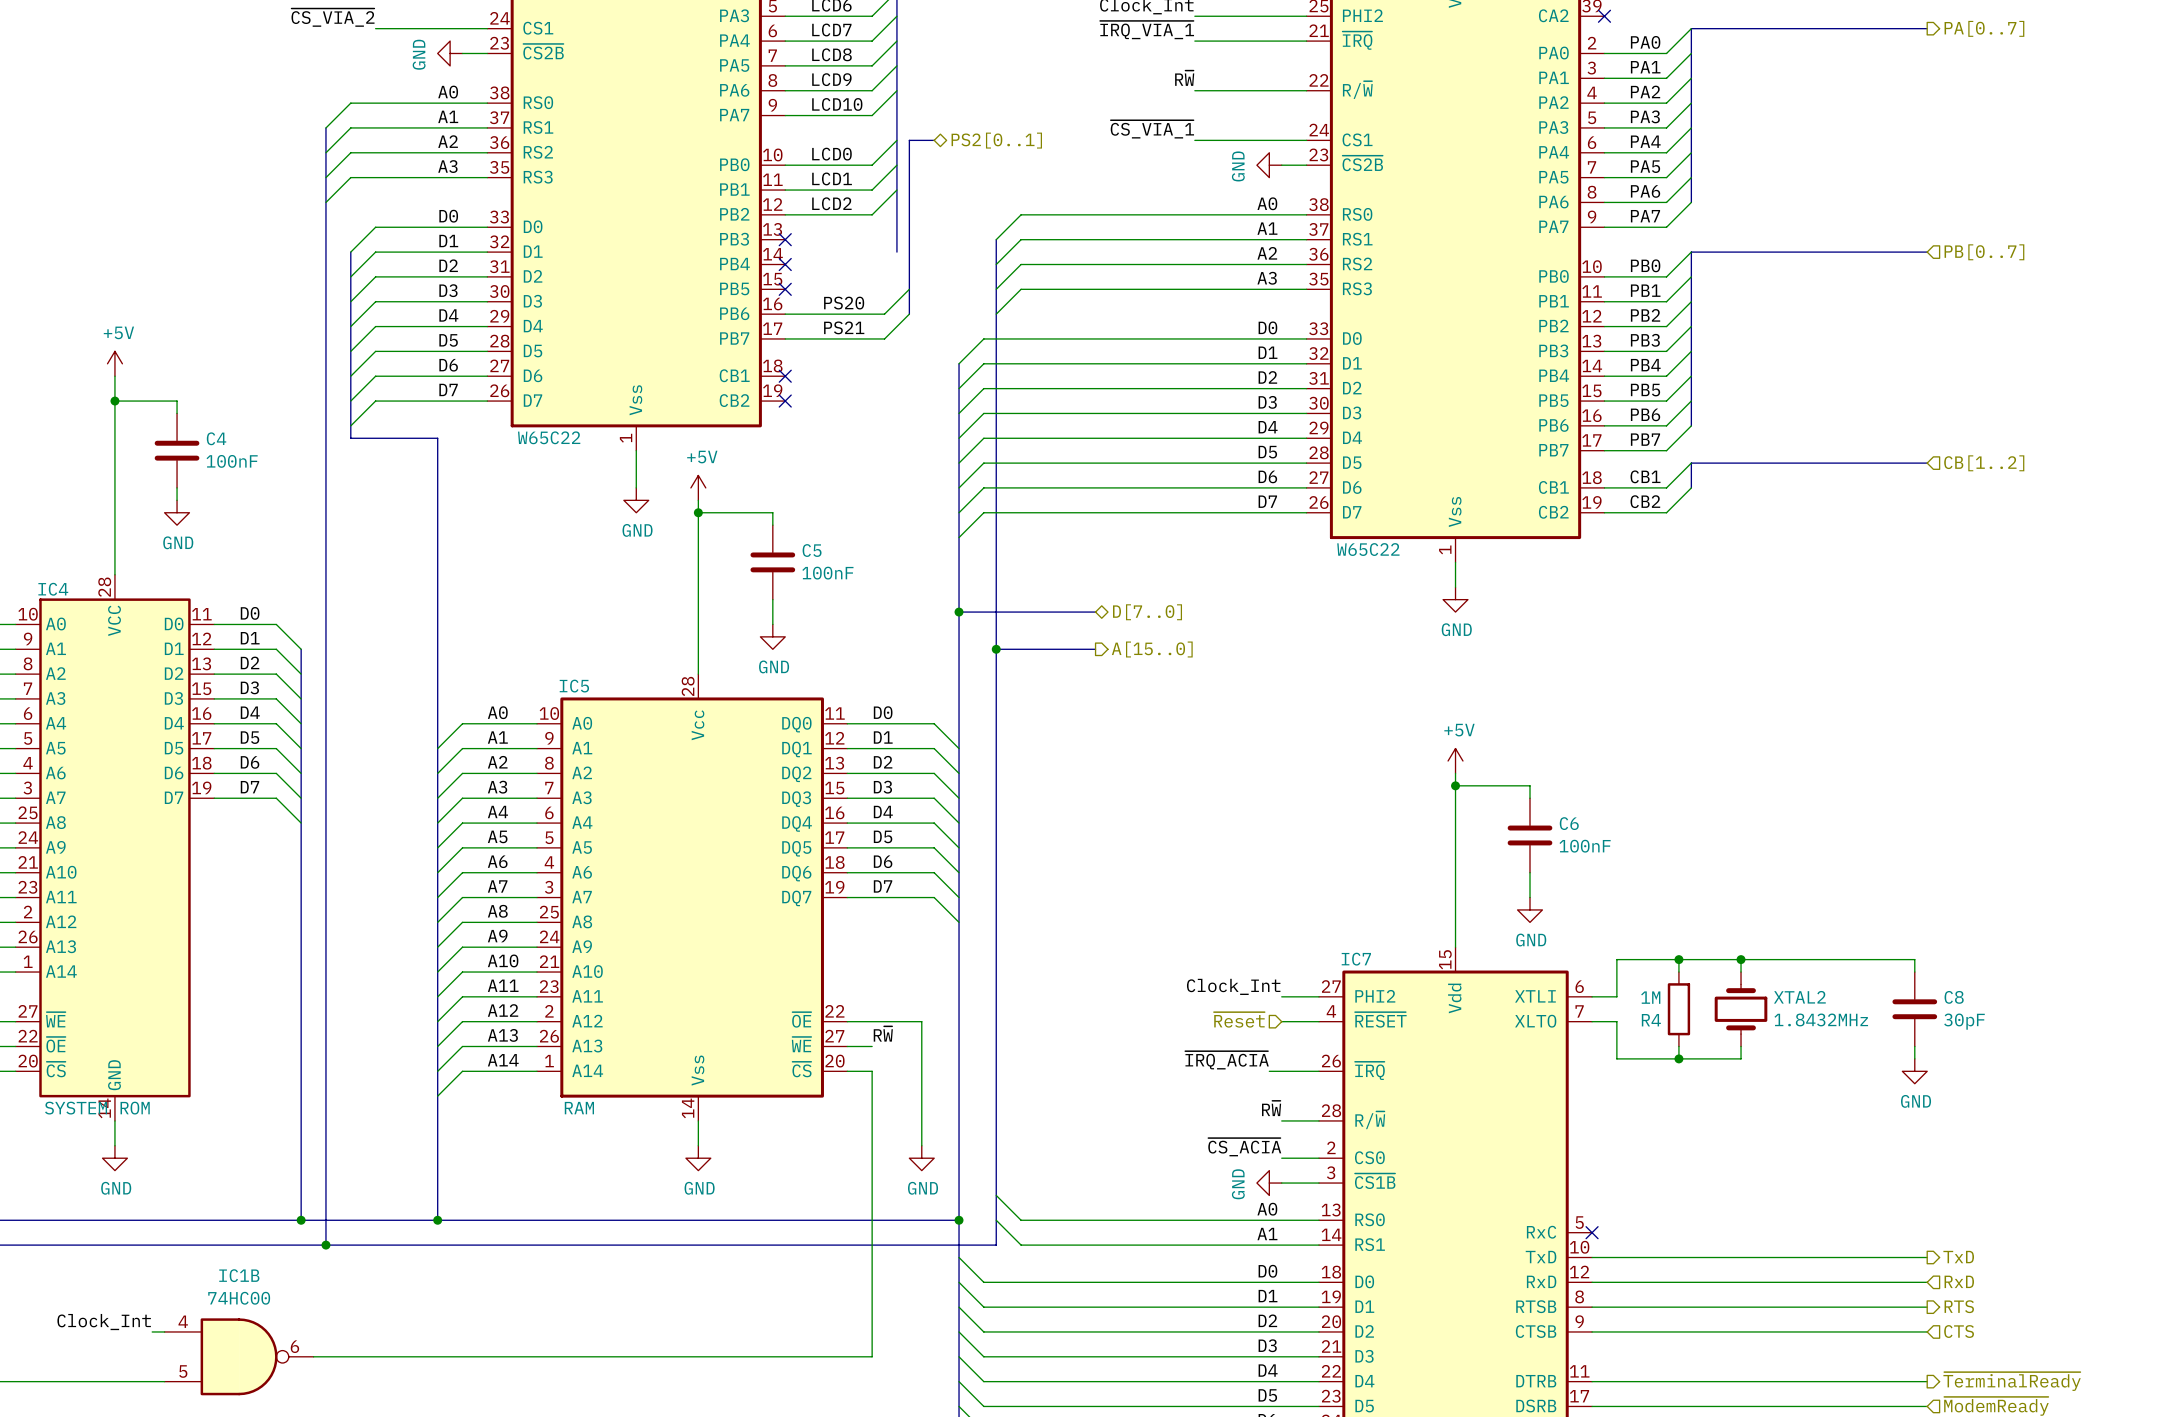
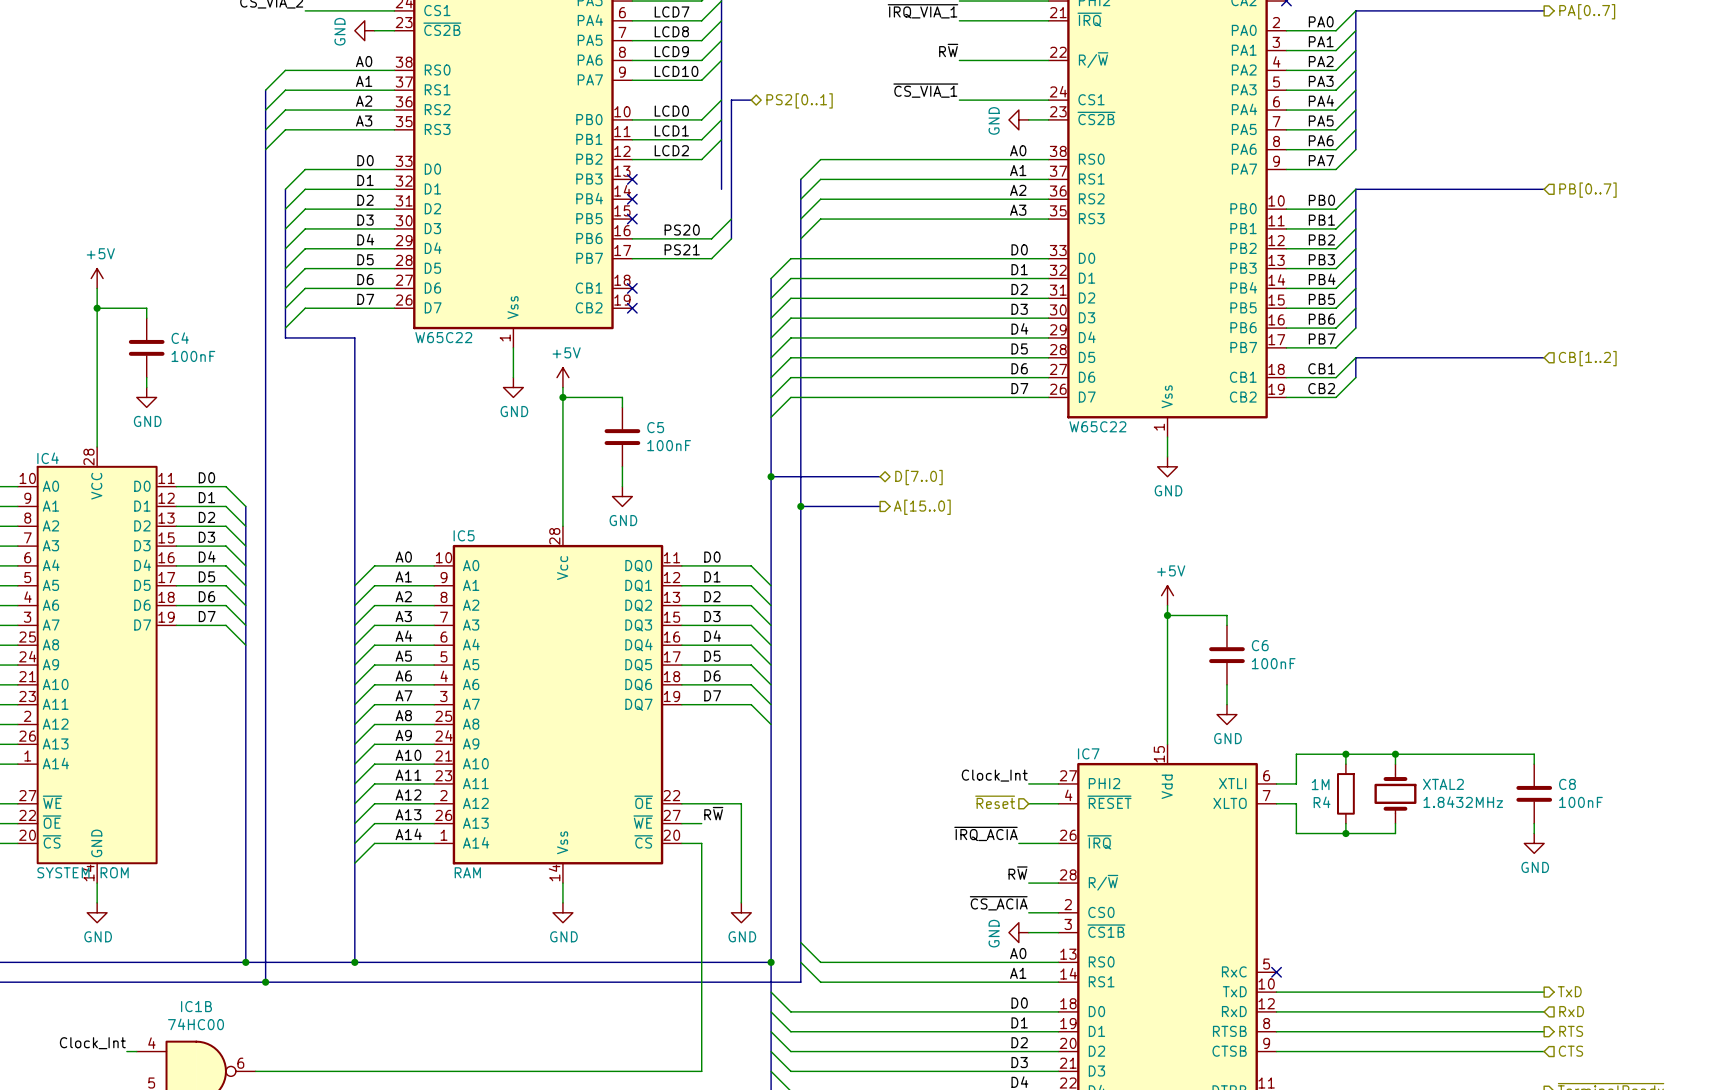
C8 value: 30pF (1964, 1021) -> 100nF (1580, 802)

